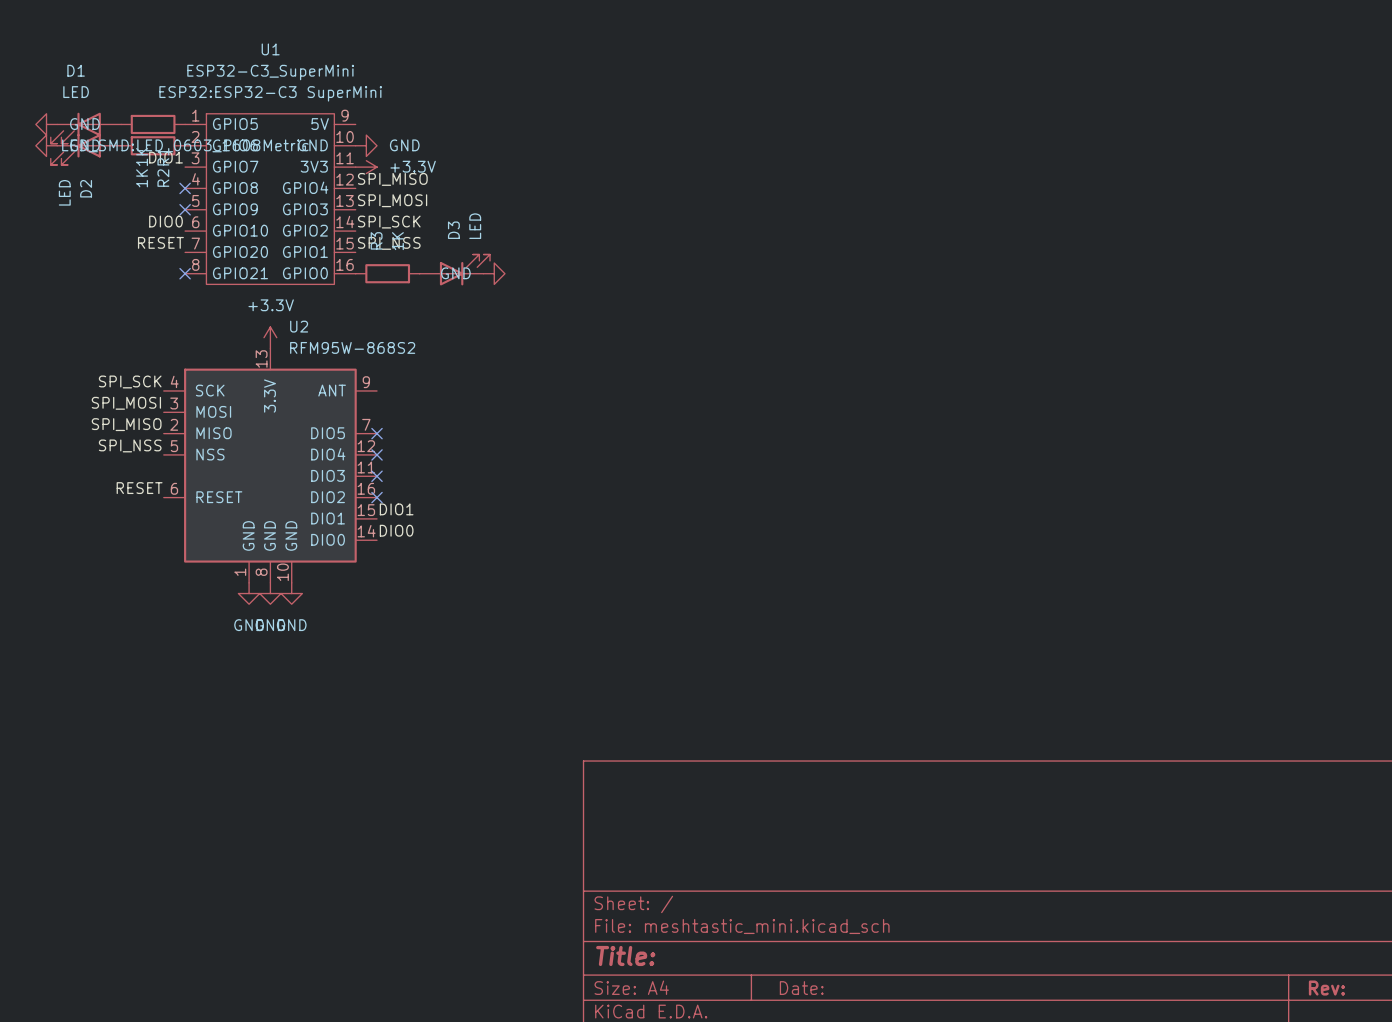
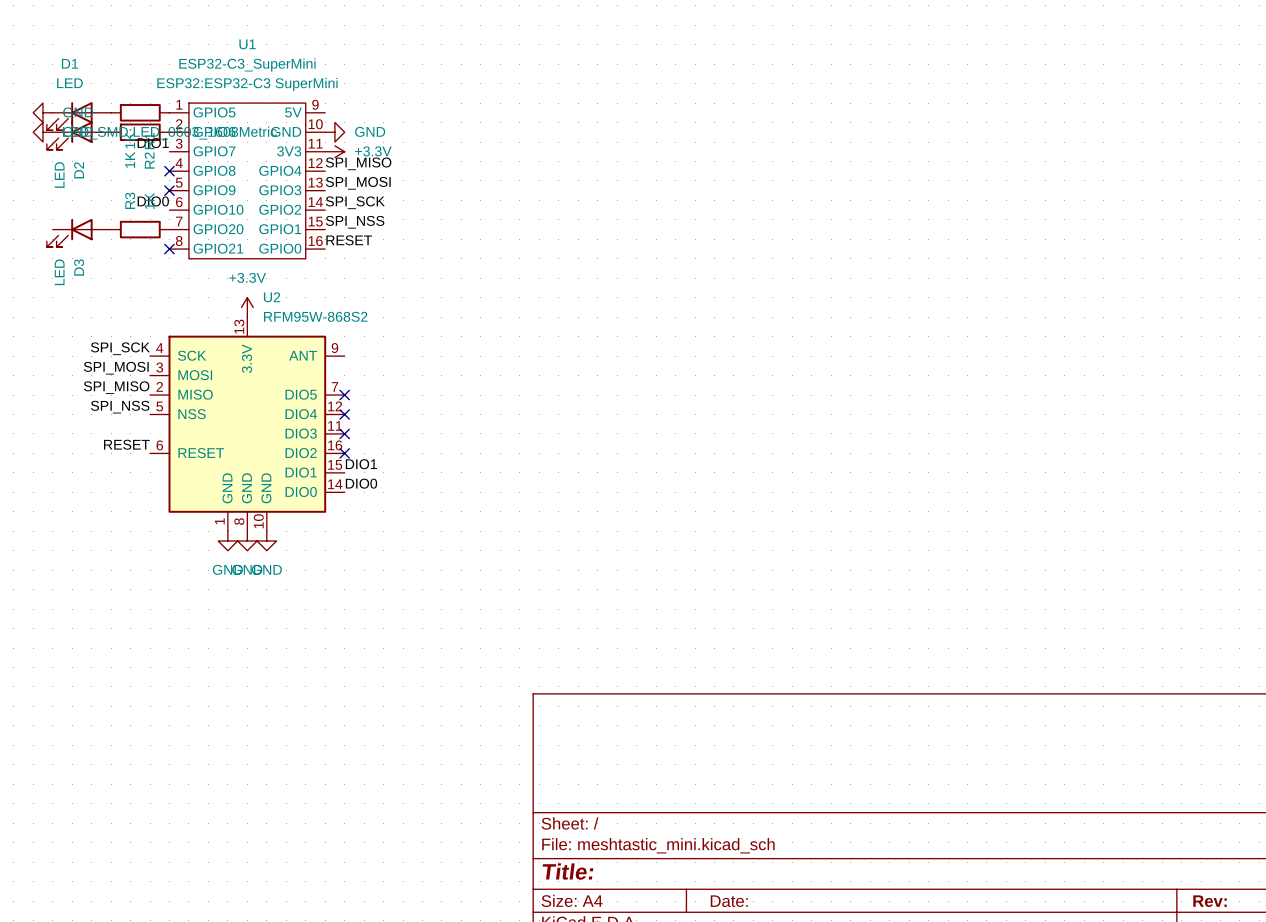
label position: RESET (160, 242) -> RESET (349, 240)
D3 position: (454, 269) -> (78, 232)
D3 rotation: 0° (464, 269) -> 180° (69, 232)
R3 position: (387, 273) -> (140, 229)
power symbol: GND (494, 273) -> none

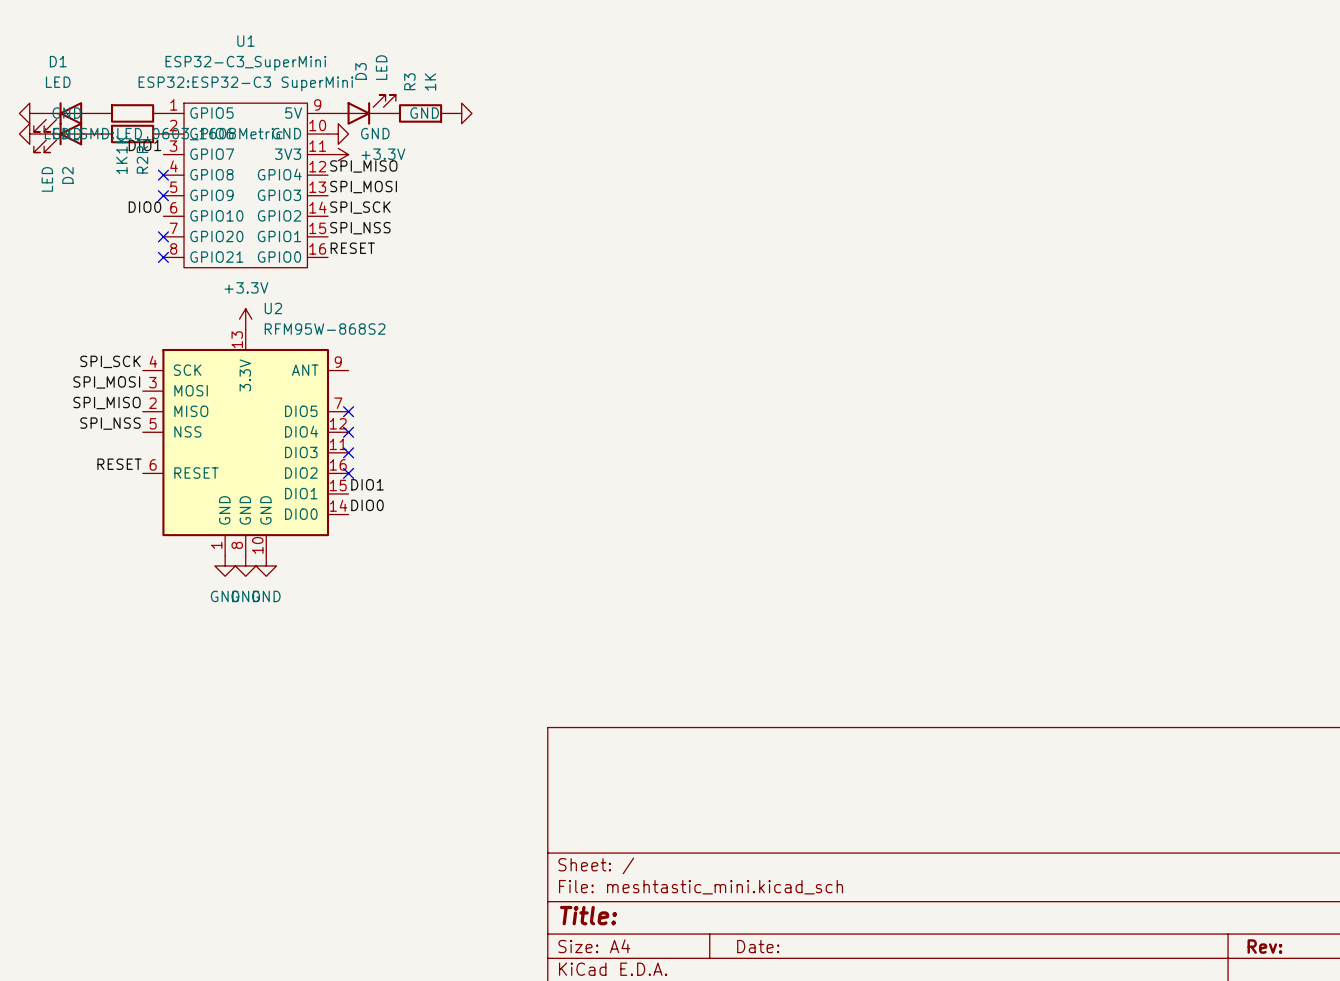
power symbol: none -> GND (461, 113)
R3 position: (140, 229) -> (420, 113)
no-connect mark: none -> (163, 236)
D3 rotation: 0° (69, 232) -> 180° (371, 109)
D3 position: (78, 232) -> (361, 109)

